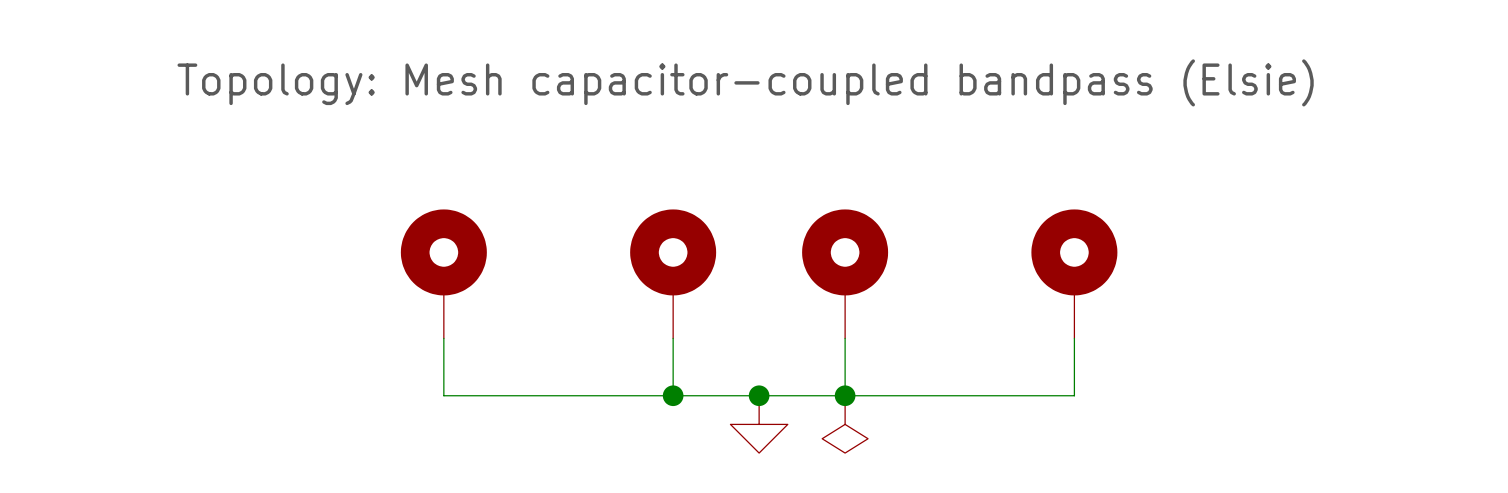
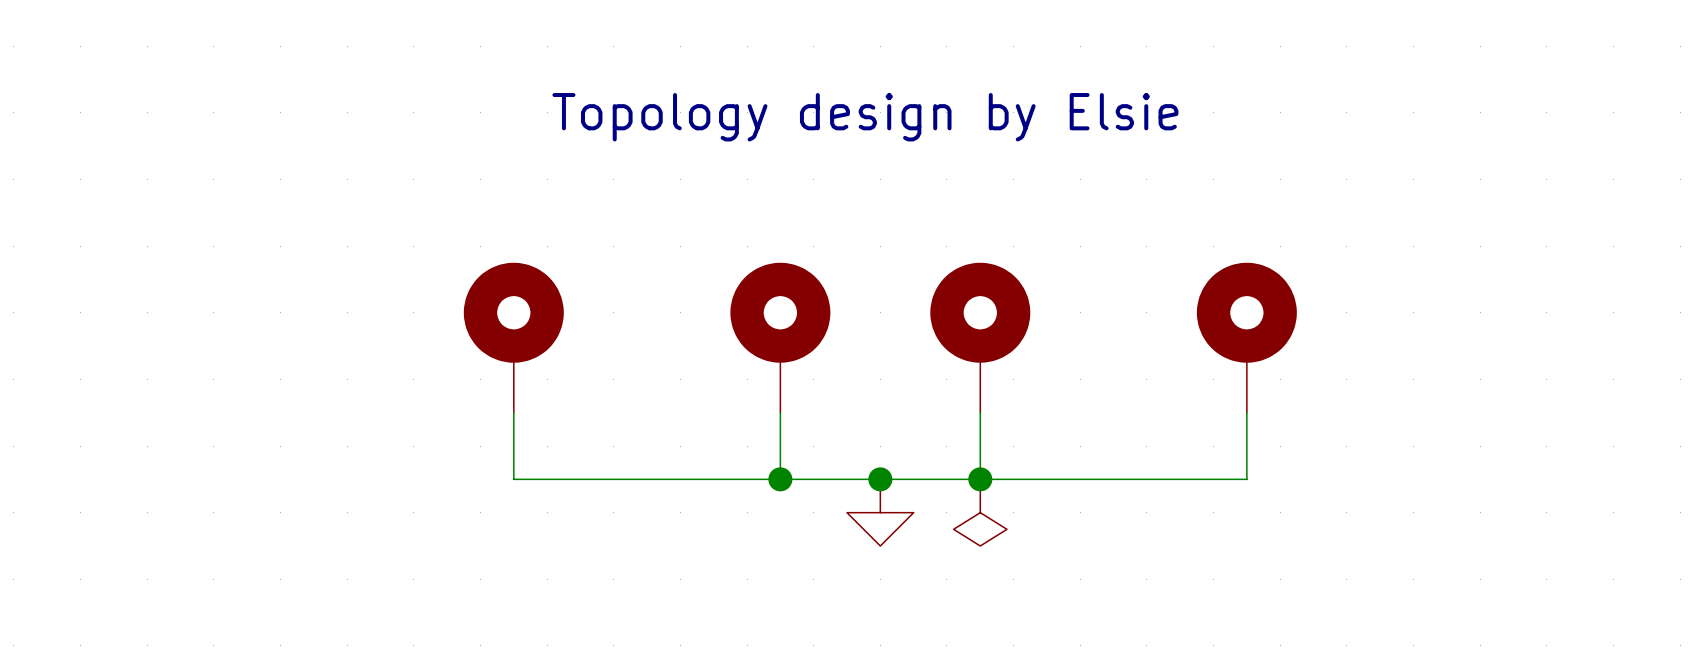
text: Topology: Mesh capacitor-coupled bandpass (Elsie) (745, 82) -> Topology design by Elsie (865, 117)

